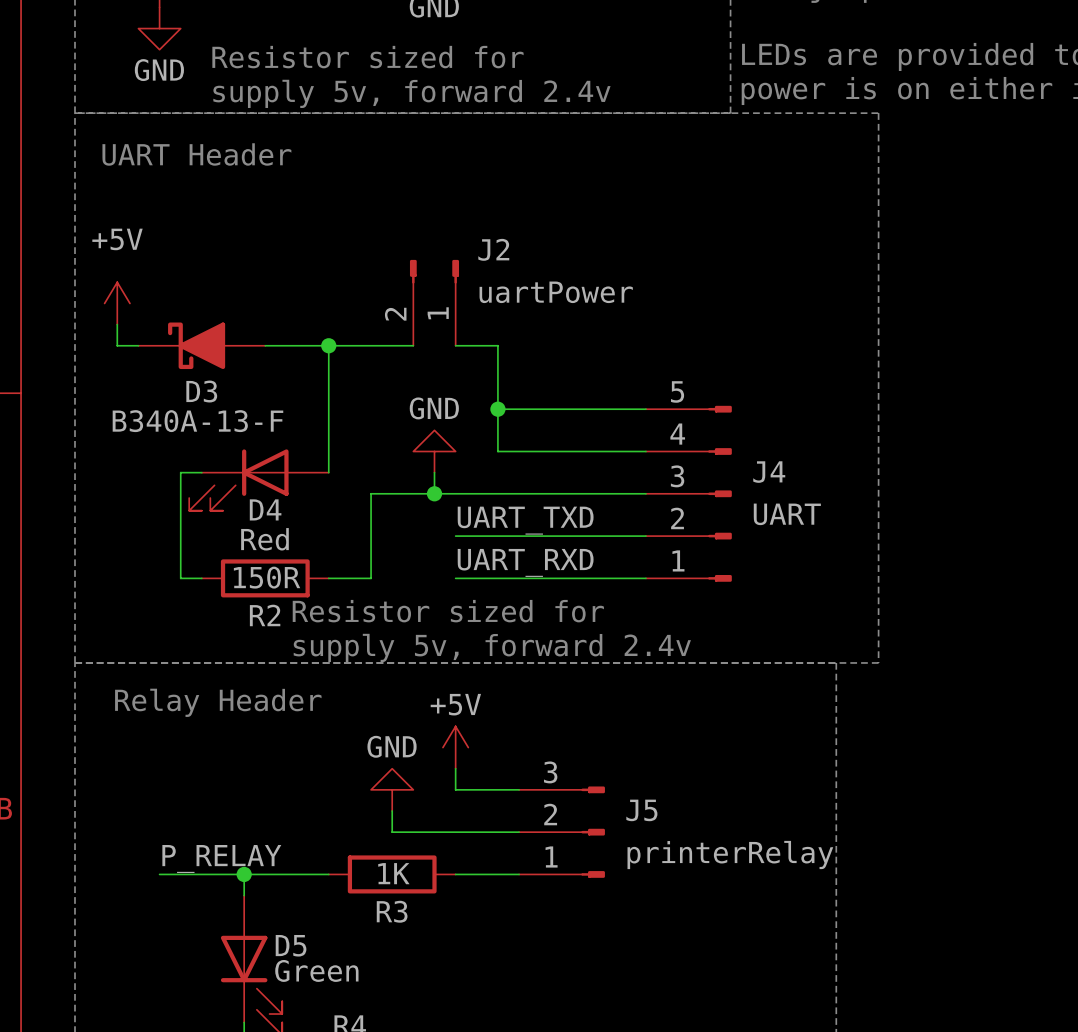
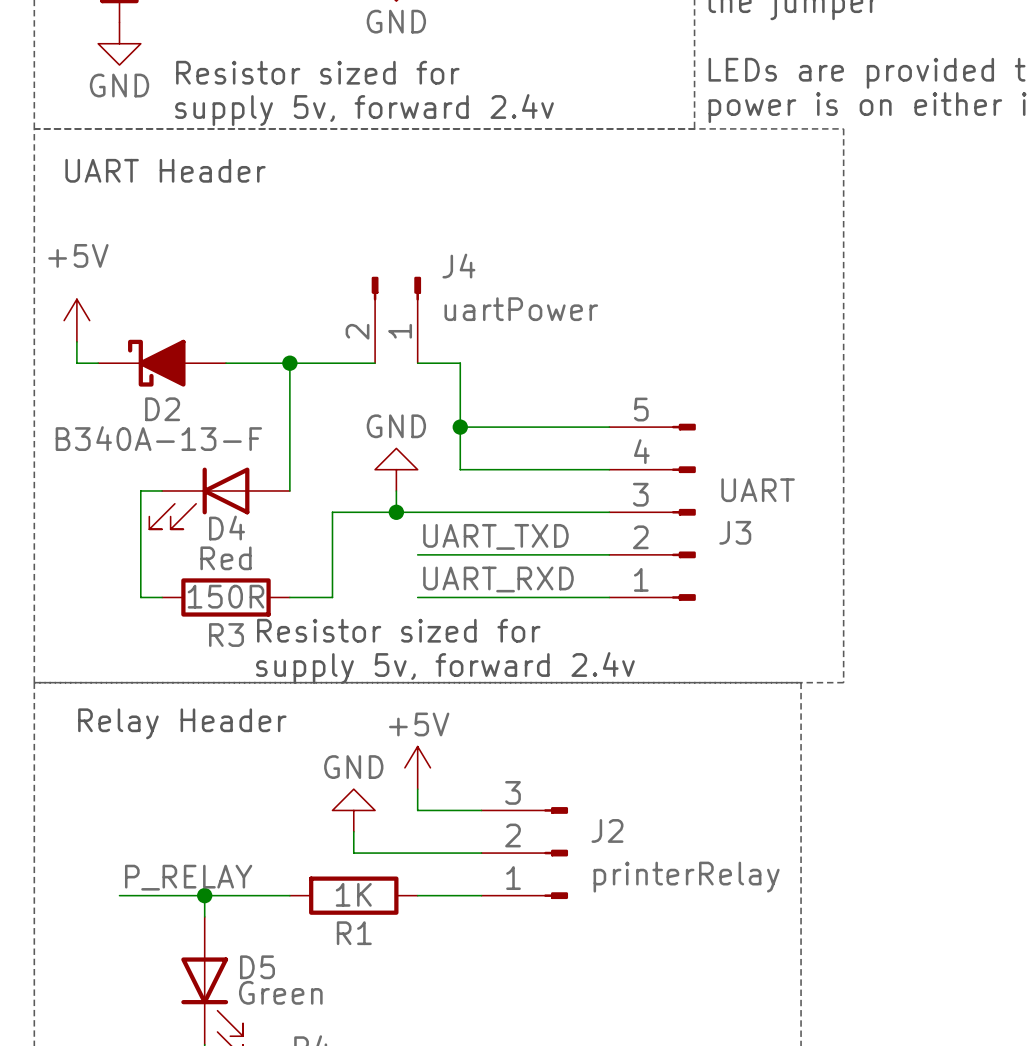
J2 name: J2 (493, 249) -> J4 (458, 266)
D3 name: D3 (201, 391) -> D2 (162, 409)
J4 name: J4 (769, 472) -> J3 (735, 532)
J4 value position: UART (787, 514) -> UART (758, 490)
R2 name: R2 (265, 615) -> R3 (226, 635)
J5 name: J5 (641, 810) -> J2 (607, 830)
R3 name: R3 (392, 911) -> R1 (354, 933)

